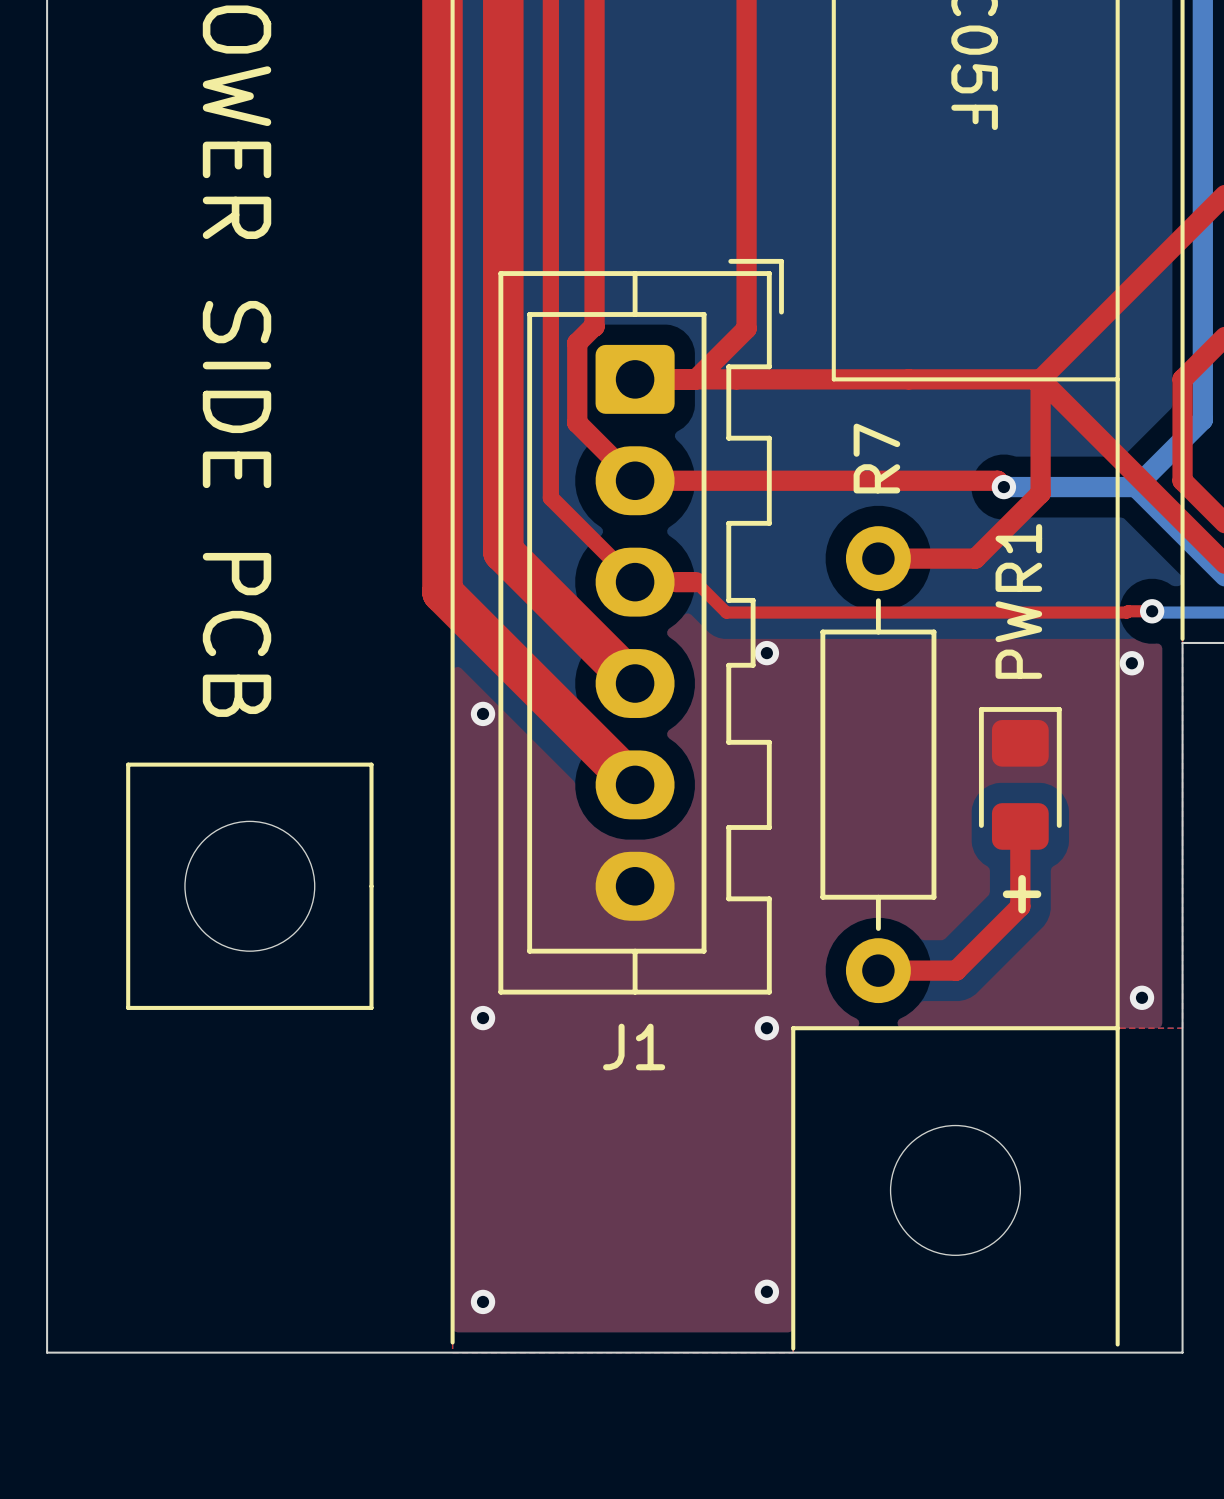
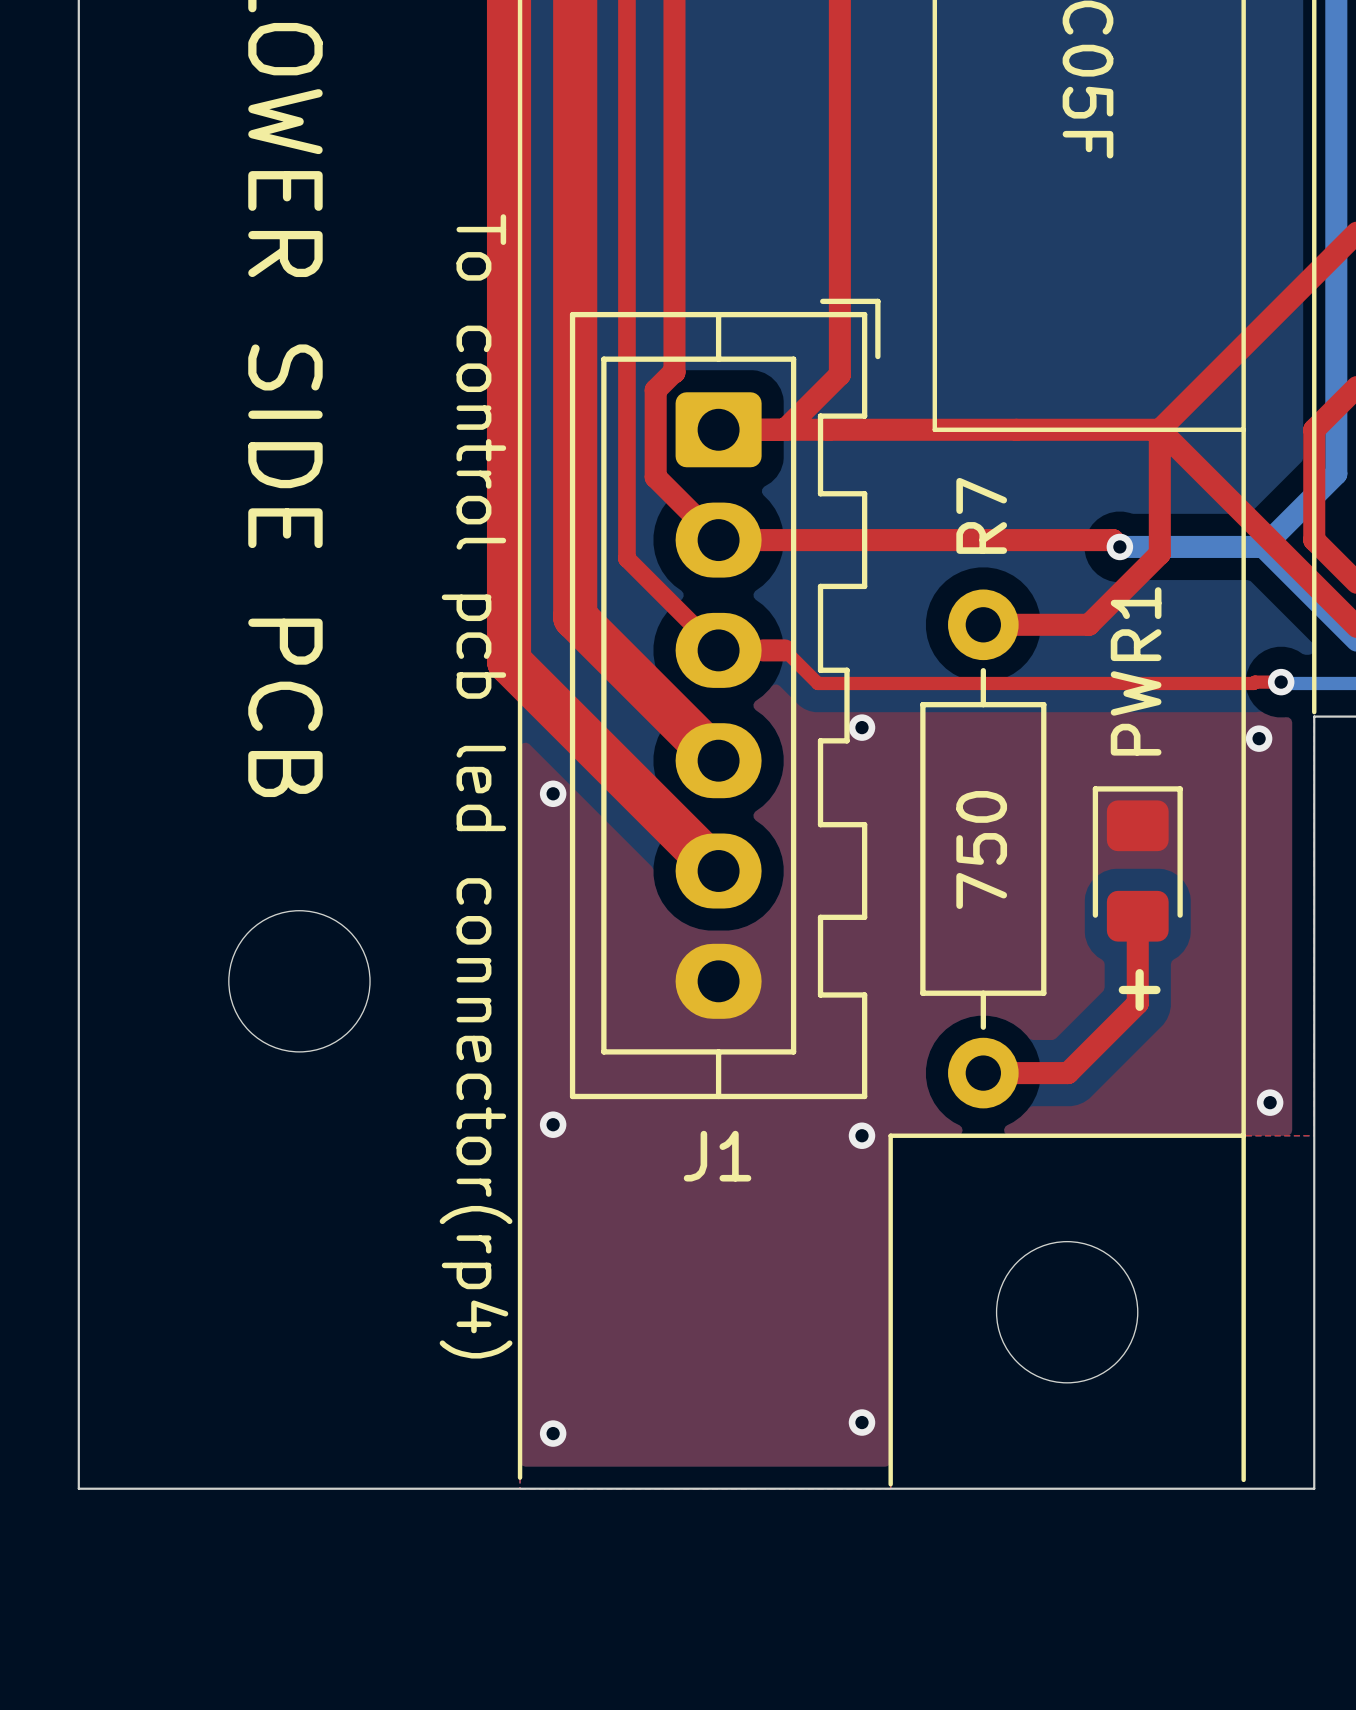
text: none -> To control pcb led connector(rp4) (476, 786)
line: (128, 764) (128, 1007) (371, 1007) (371, 764) (128, 764) -> none
R7 value: none -> 750 (981, 849)

